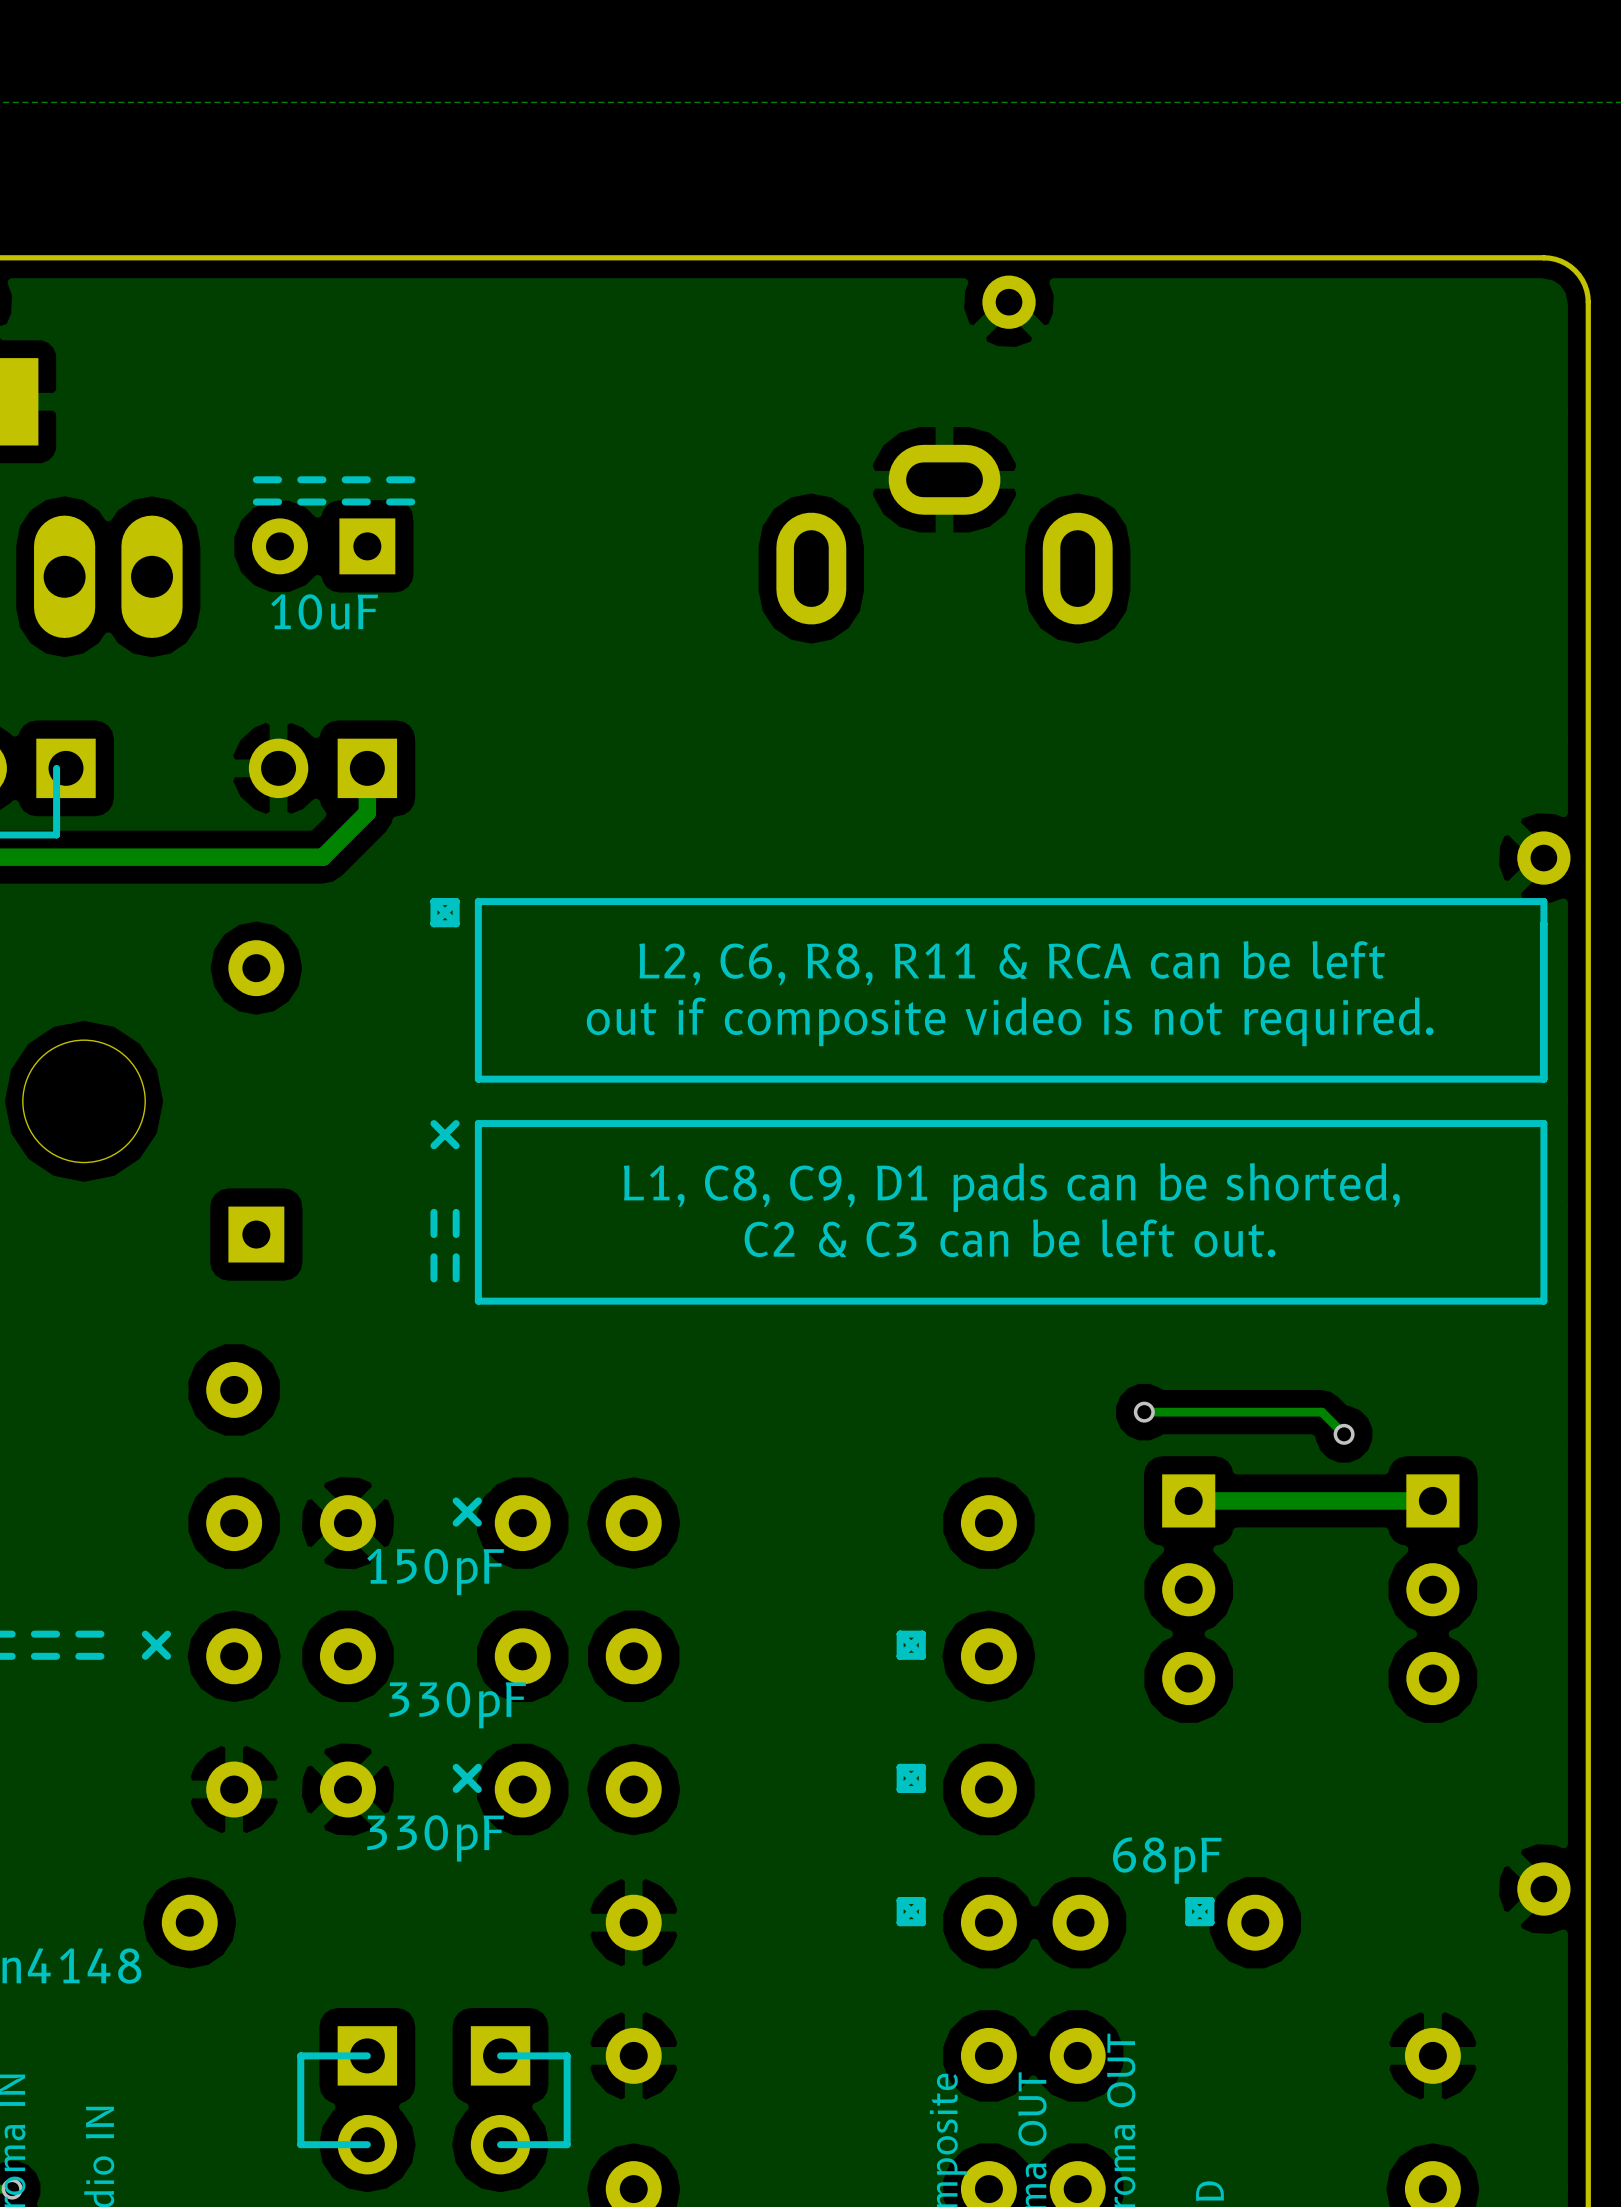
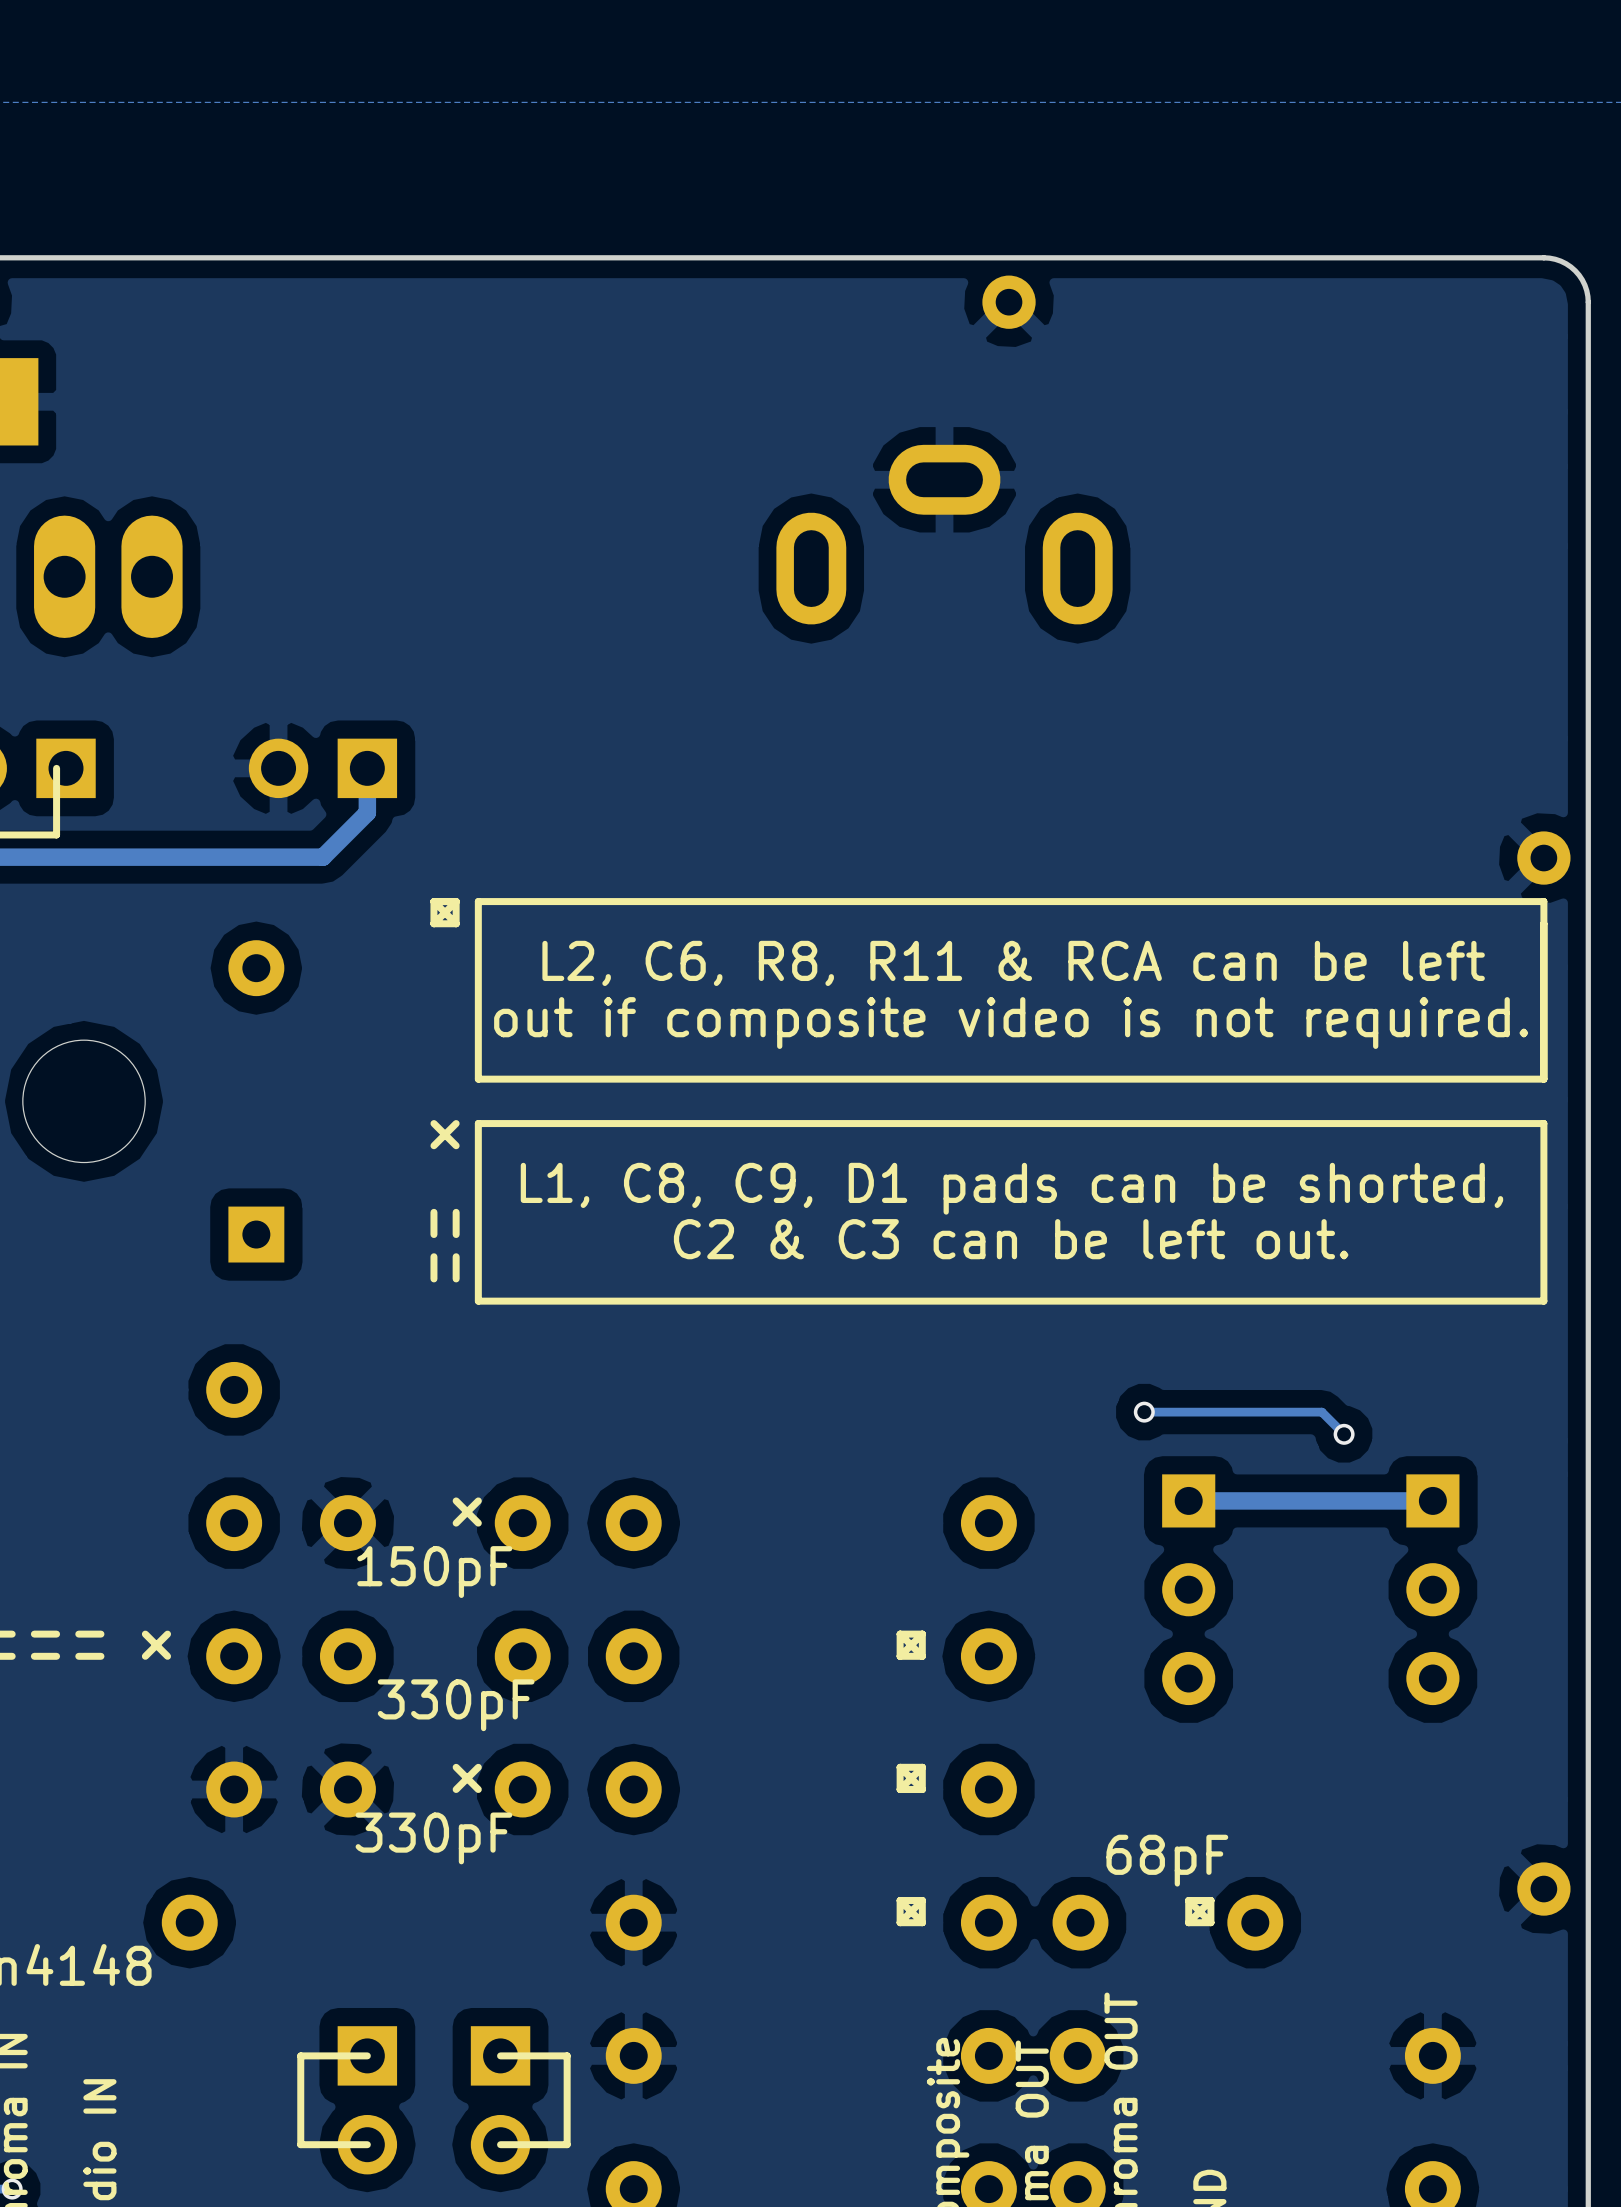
line: (278, 479) (256, 479) -> none
line: (322, 479) (300, 479) -> none
line: (367, 479) (345, 479) -> none
line: (411, 479) (389, 479) -> none
line: (278, 501) (256, 501) -> none
line: (322, 501) (300, 501) -> none
line: (367, 501) (345, 501) -> none
line: (411, 501) (389, 501) -> none
part: 10uF (323, 546) -> none

